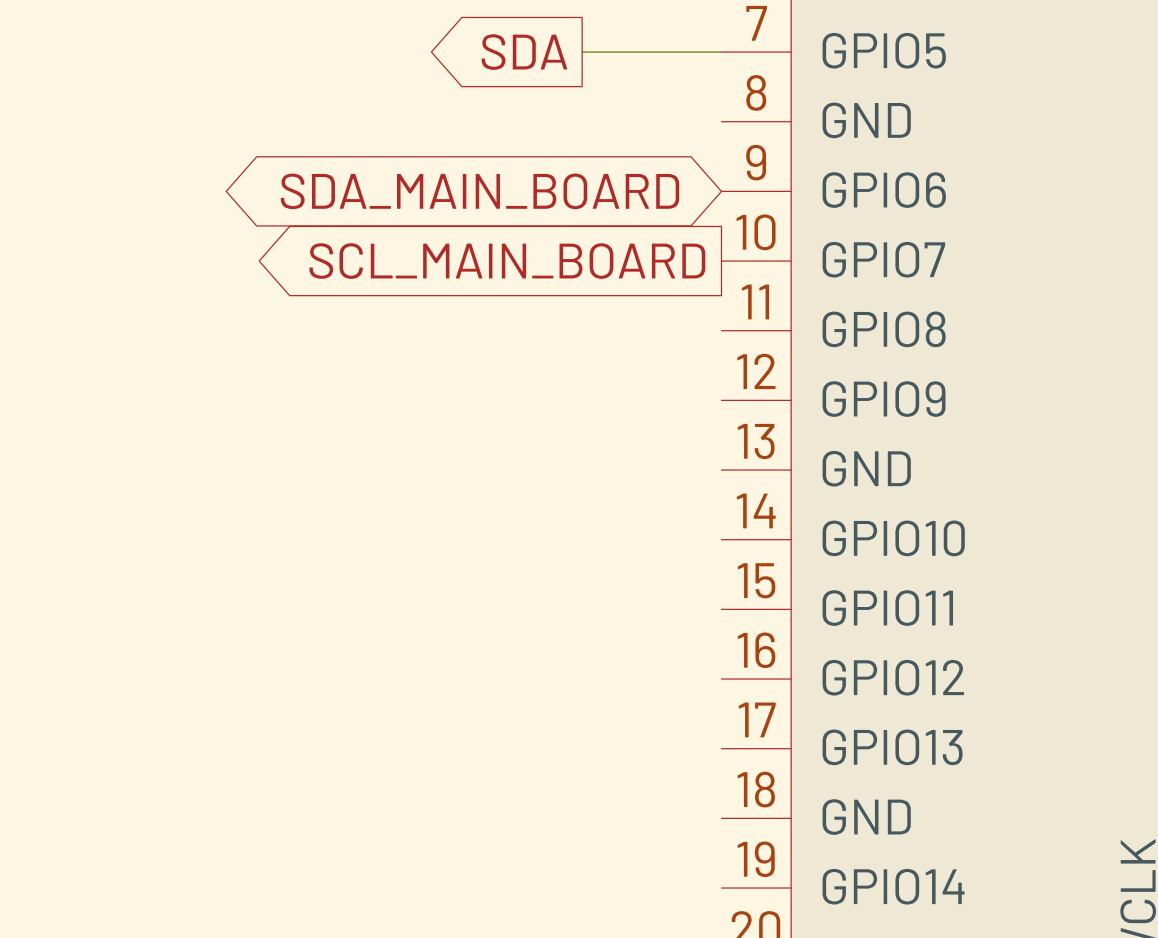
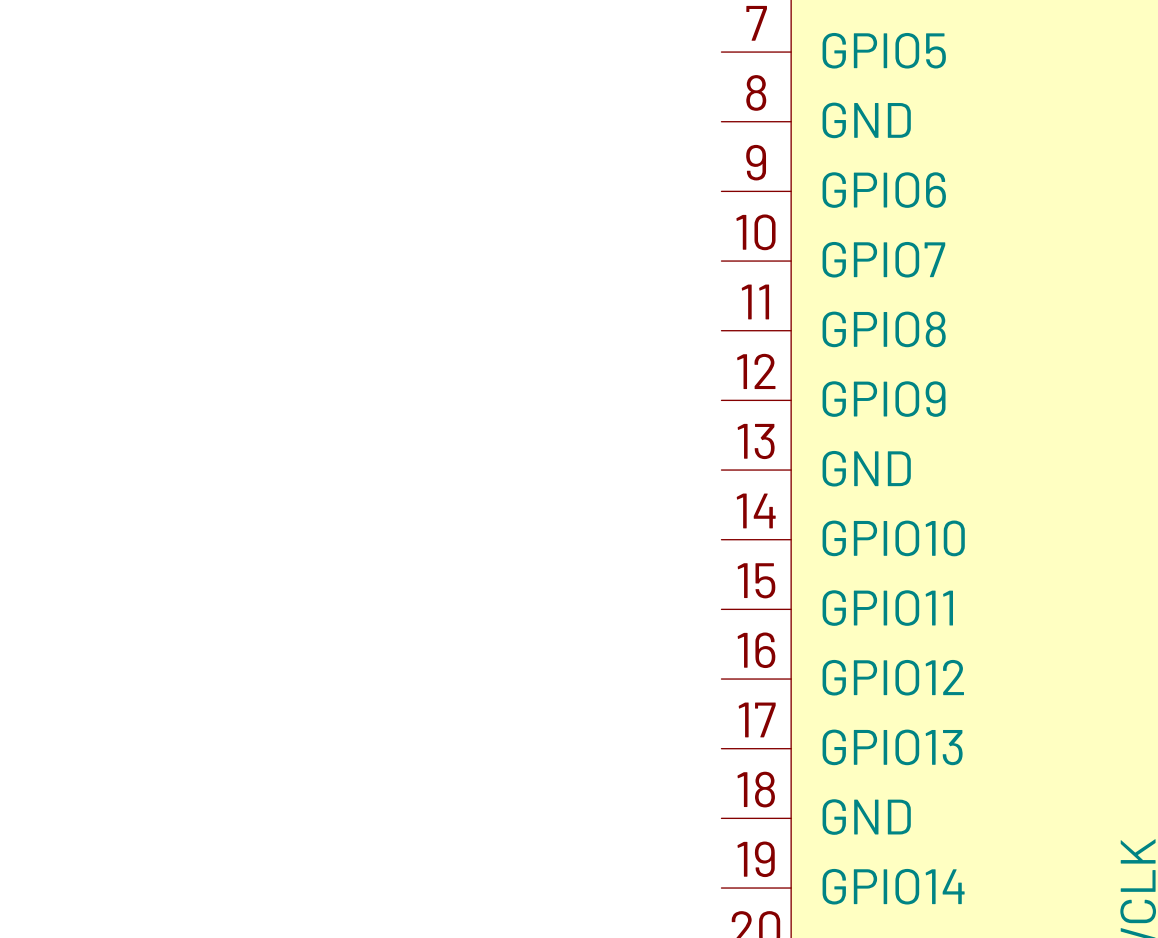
global label: SDA (524, 52) -> none
wire: (582, 52) (721, 52) -> none
global label: SDA_MAIN_BOARD (480, 191) -> none
global label: SCL_MAIN_BOARD (507, 261) -> none

